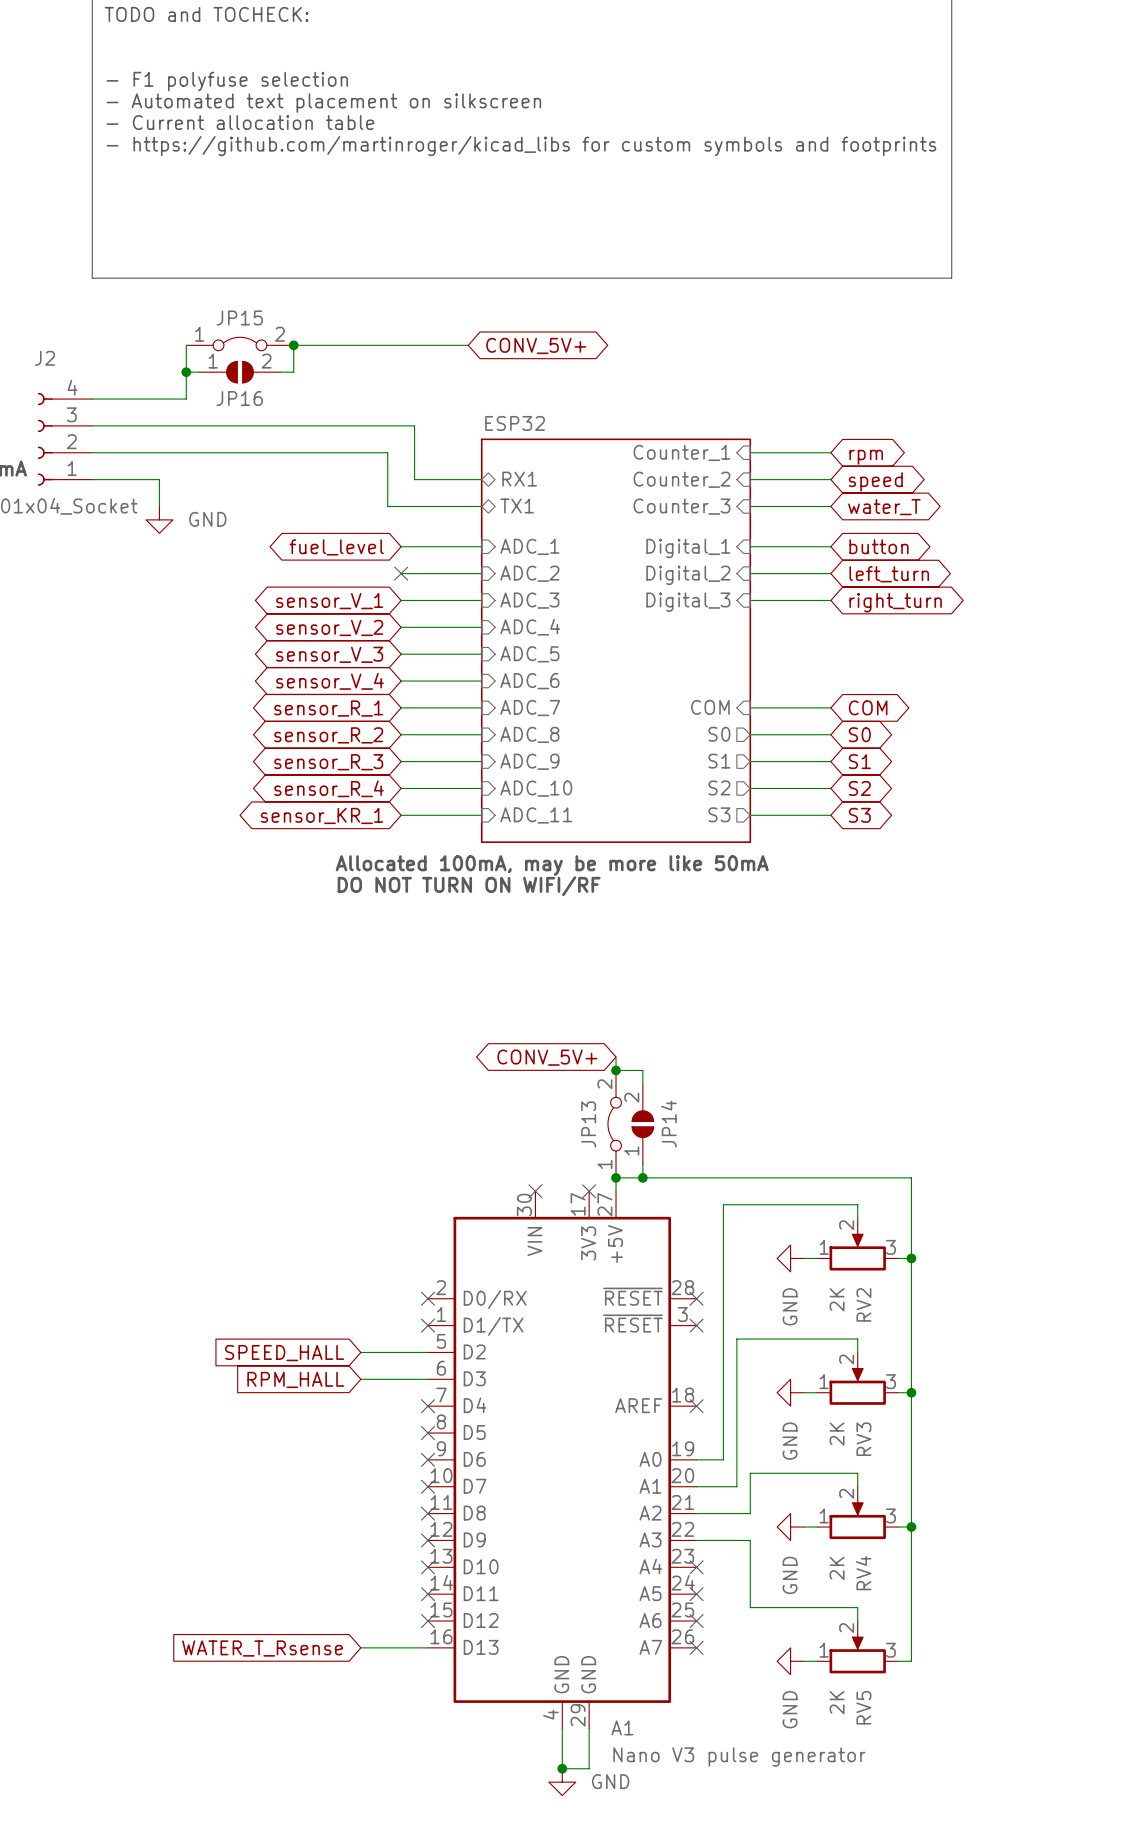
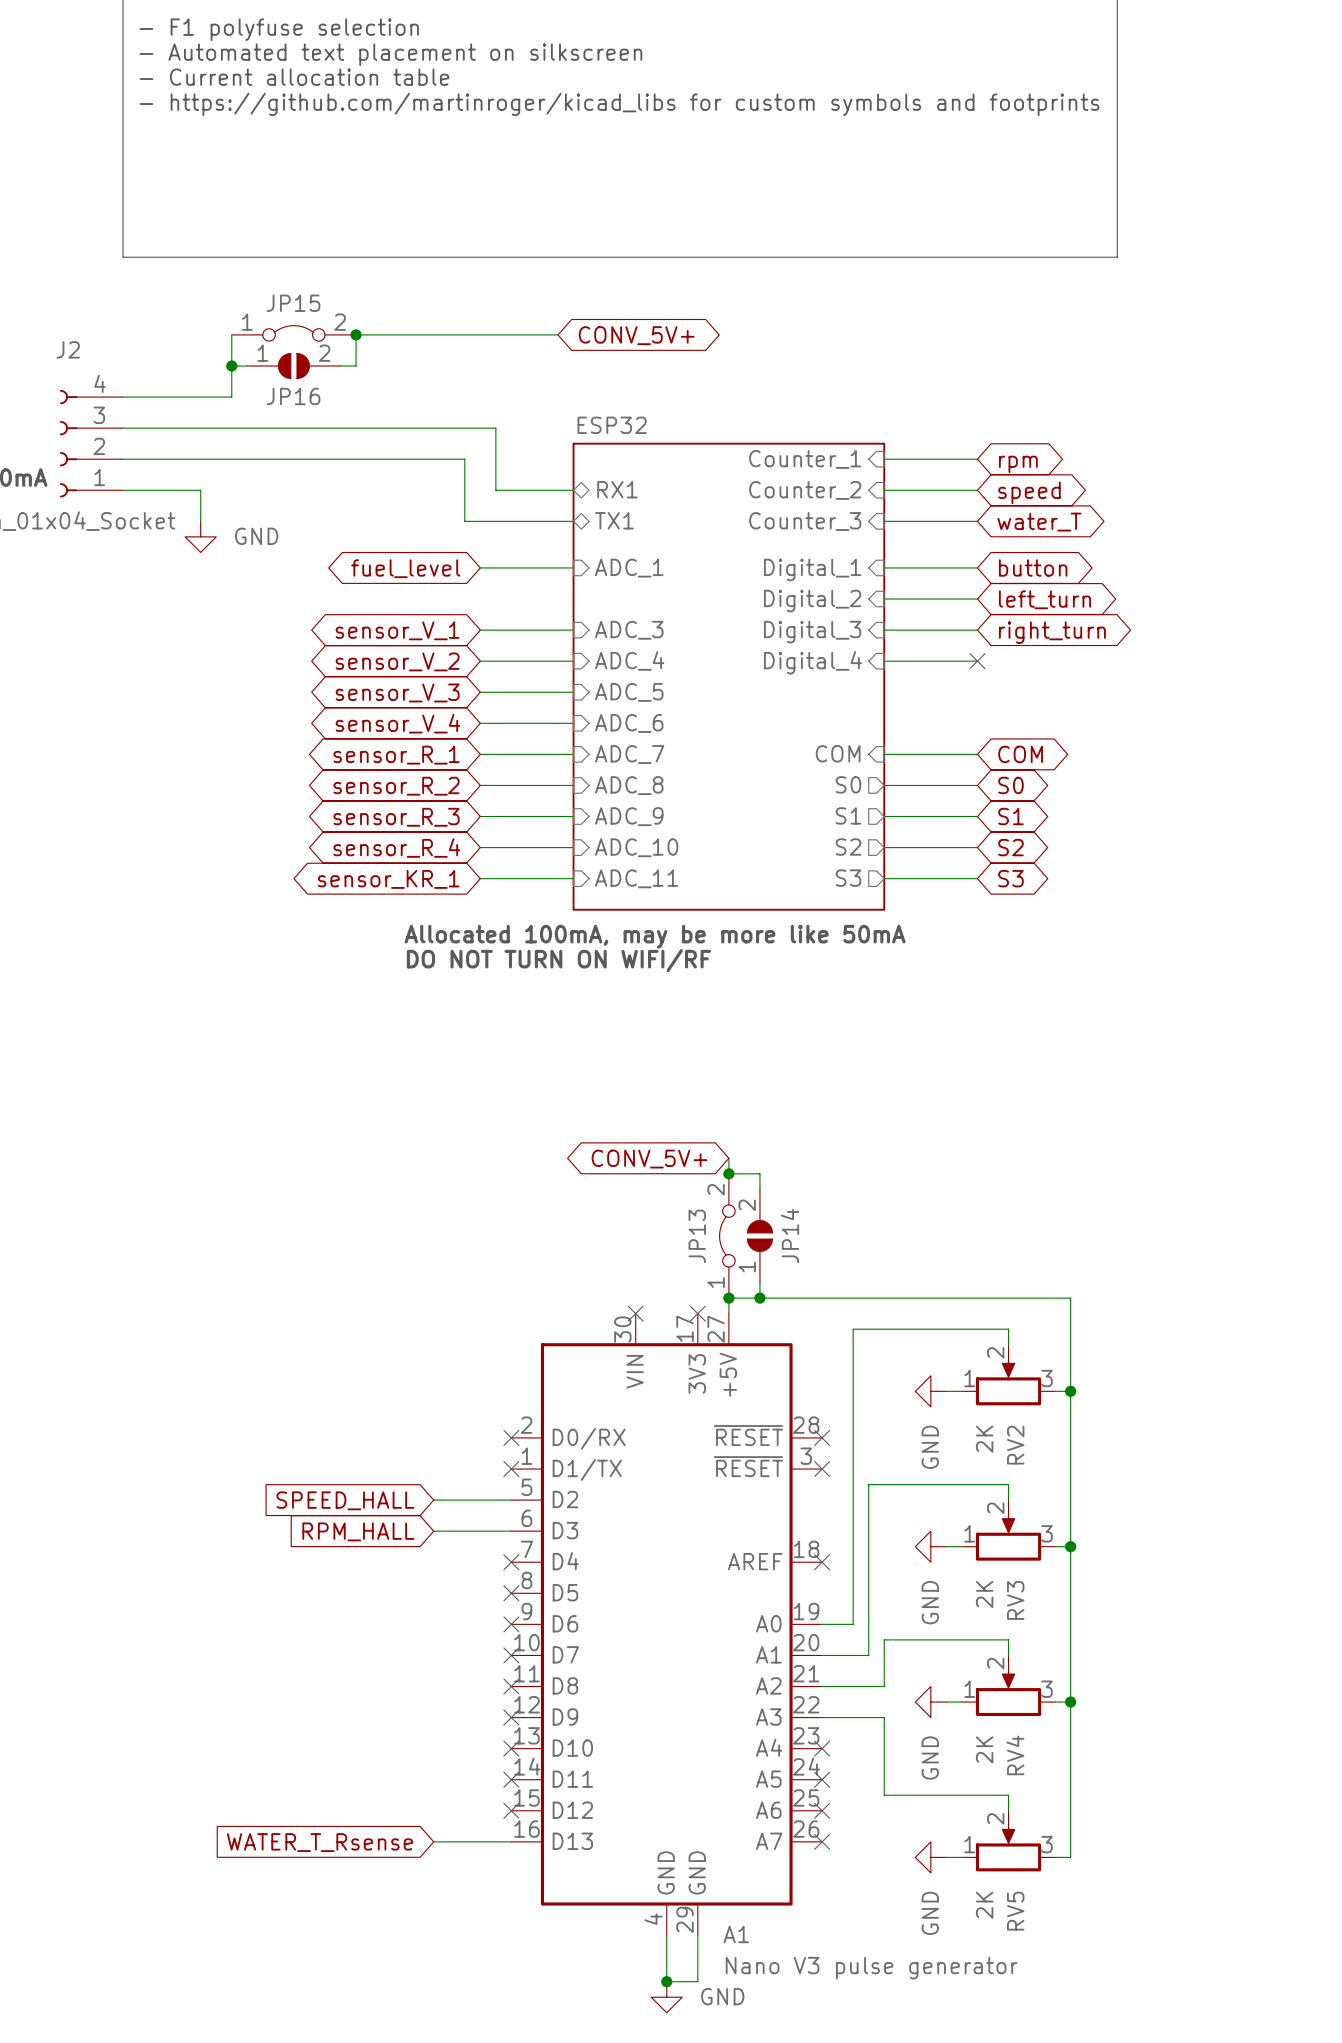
wire: (401, 573) (481, 573) -> none
no-connect mark: (401, 573) -> none
sheet pin: ADC_2 (529, 573) -> none
wire: none -> (884, 661) (977, 661)
no-connect mark: none -> (977, 661)
sheet pin: none -> Digital_4 (812, 662)

